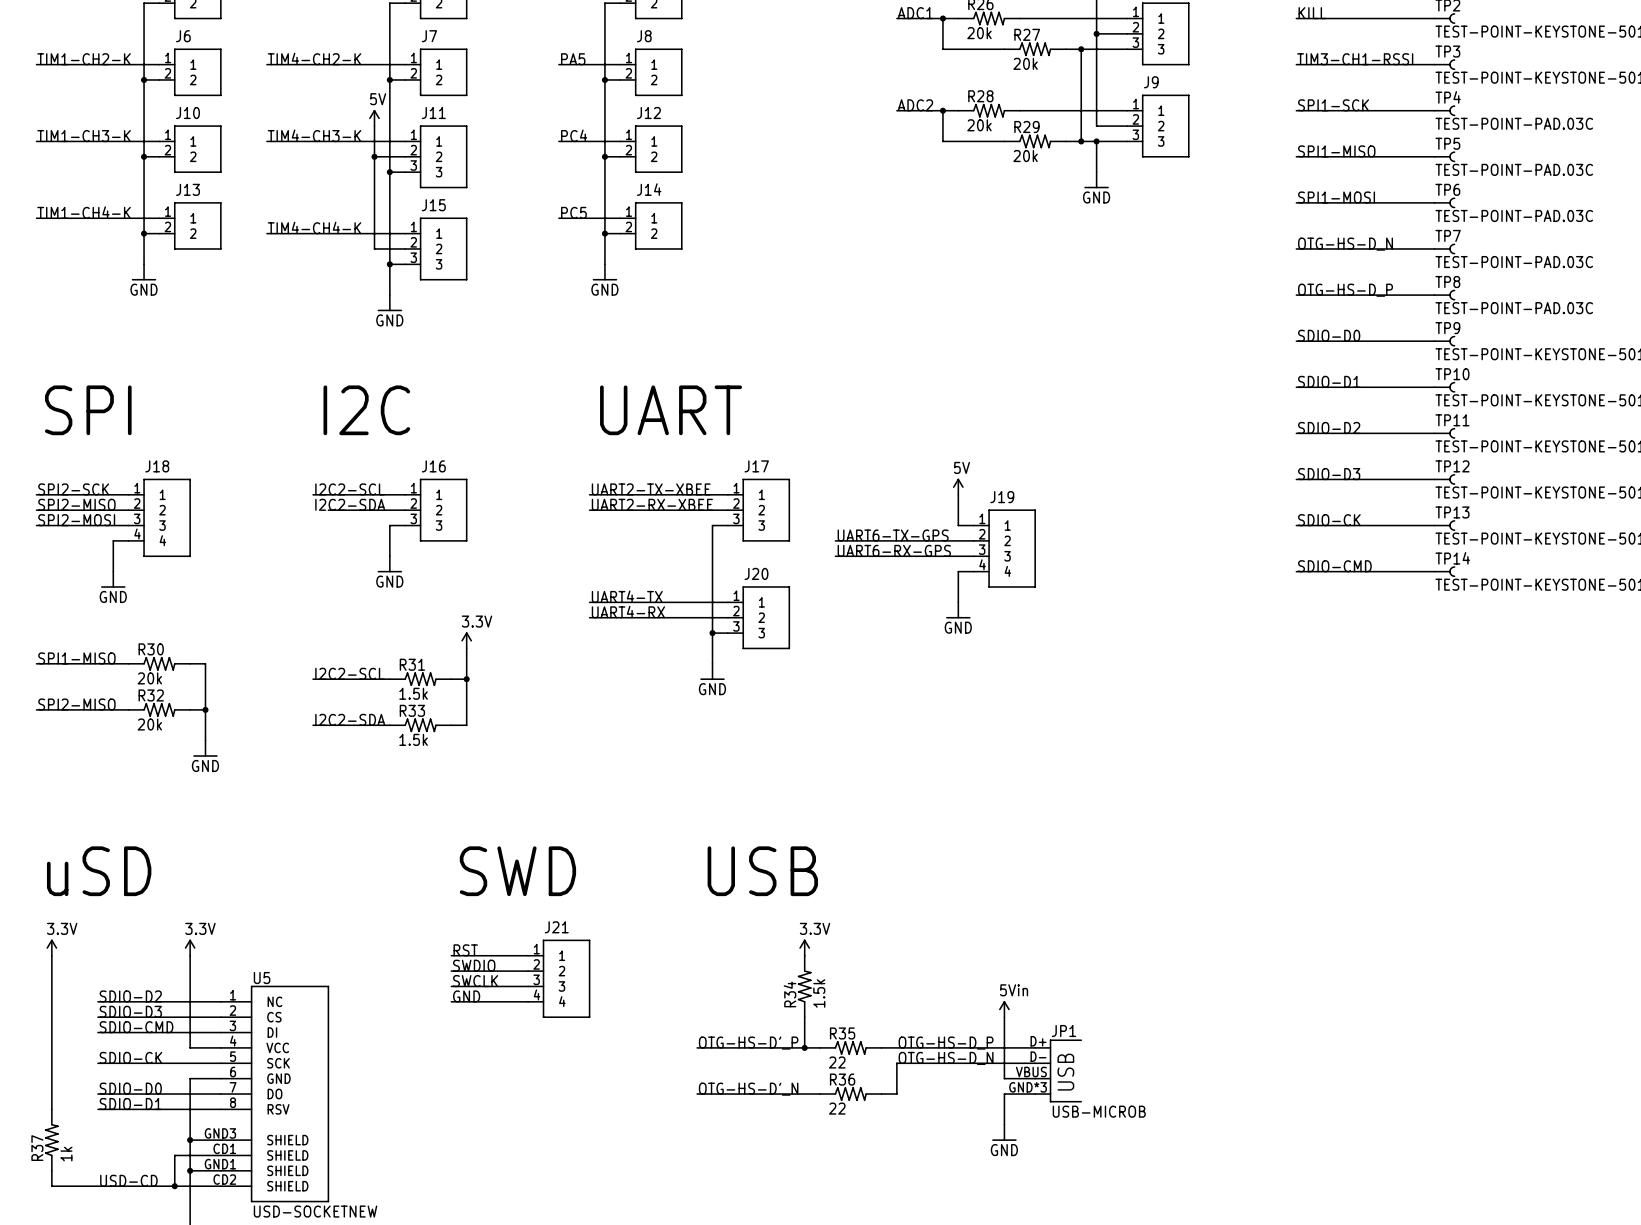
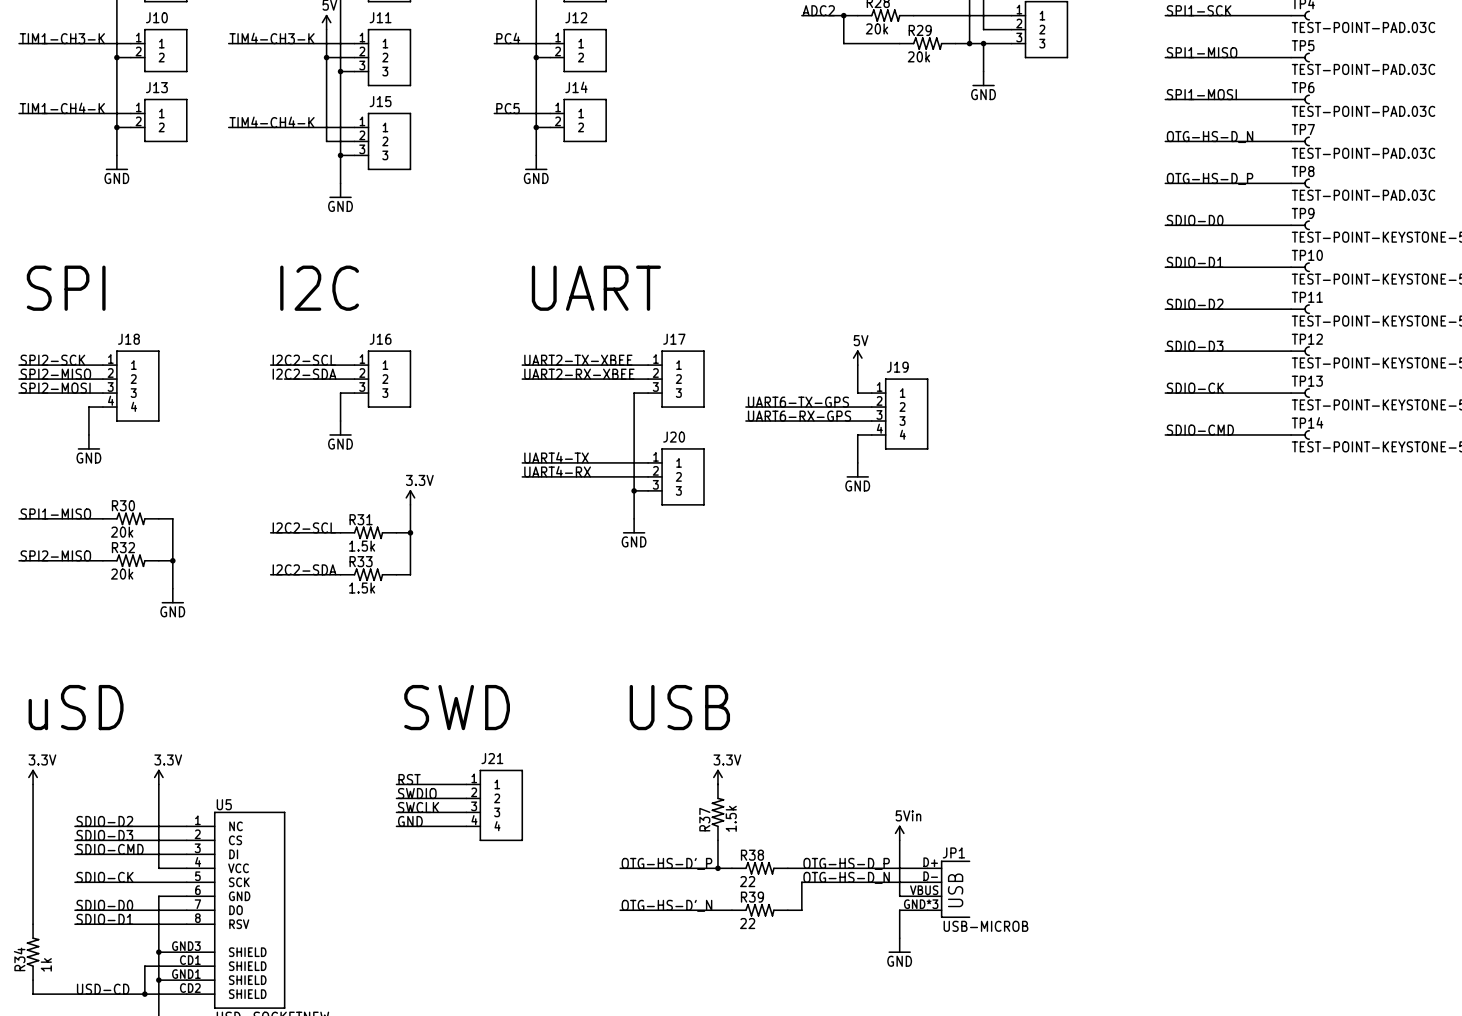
R34 name: R34 (789, 994) -> R37 (704, 819)
R35 name: R35 (842, 1033) -> R38 (752, 855)
R36 name: R36 (842, 1079) -> R39 (752, 897)
R37 name: R37 (37, 1148) -> R34 (19, 959)

